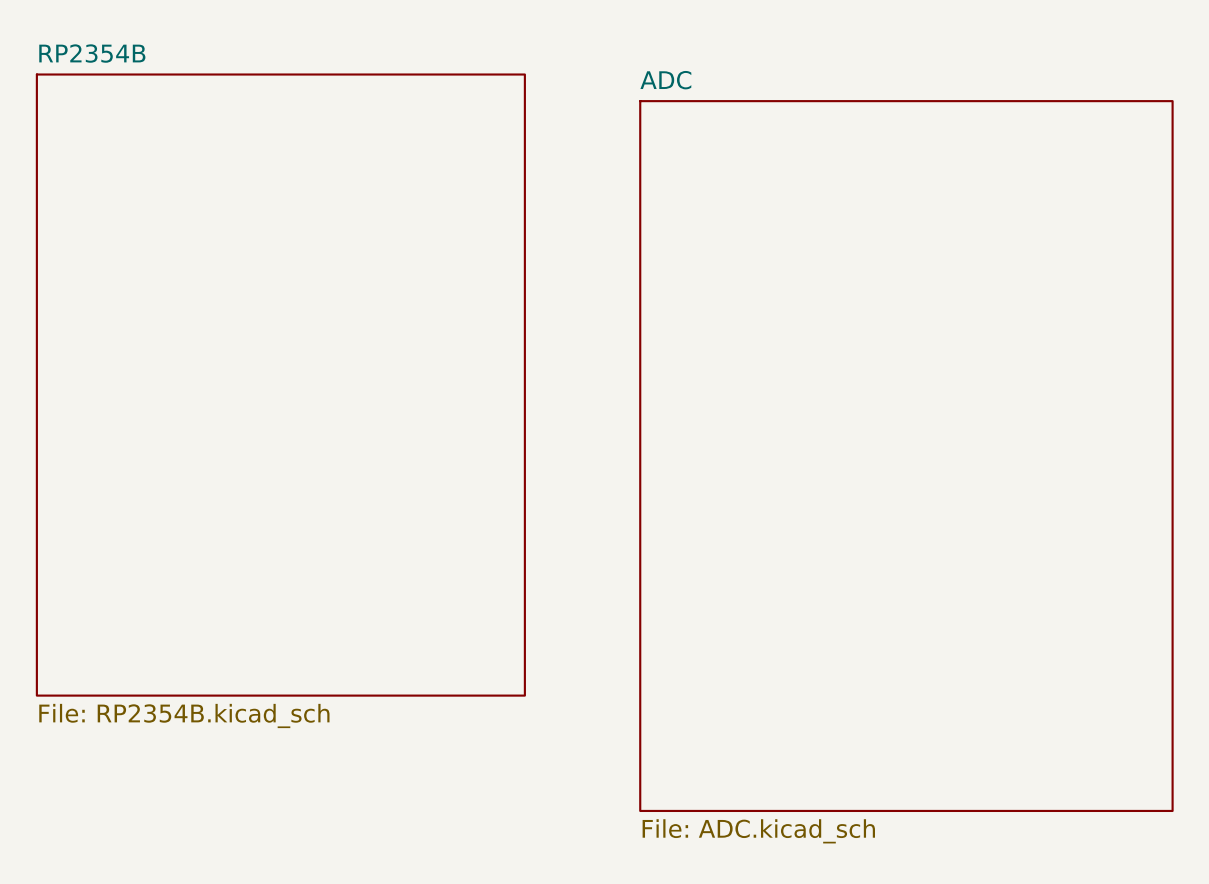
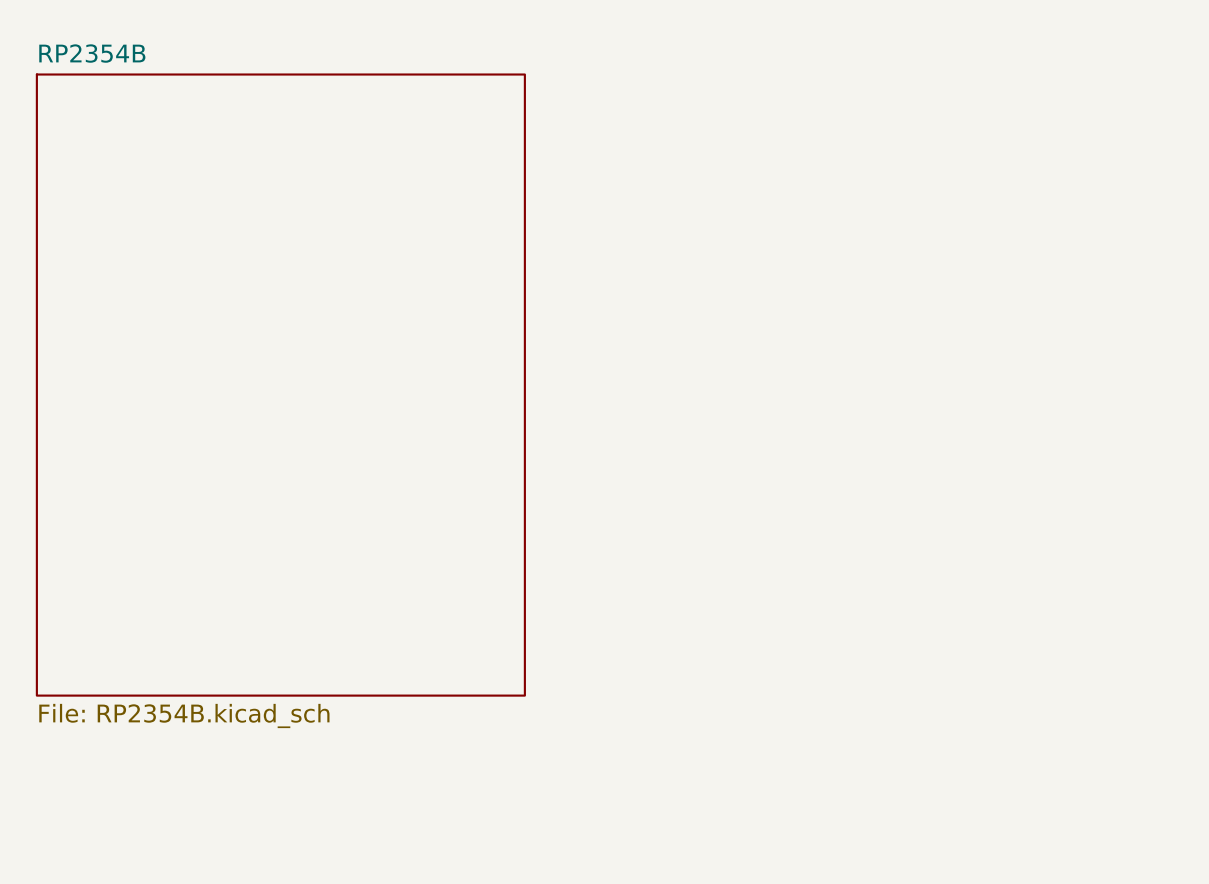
sheet ADC: File: ADC.kicad_sch (906, 456) -> none

